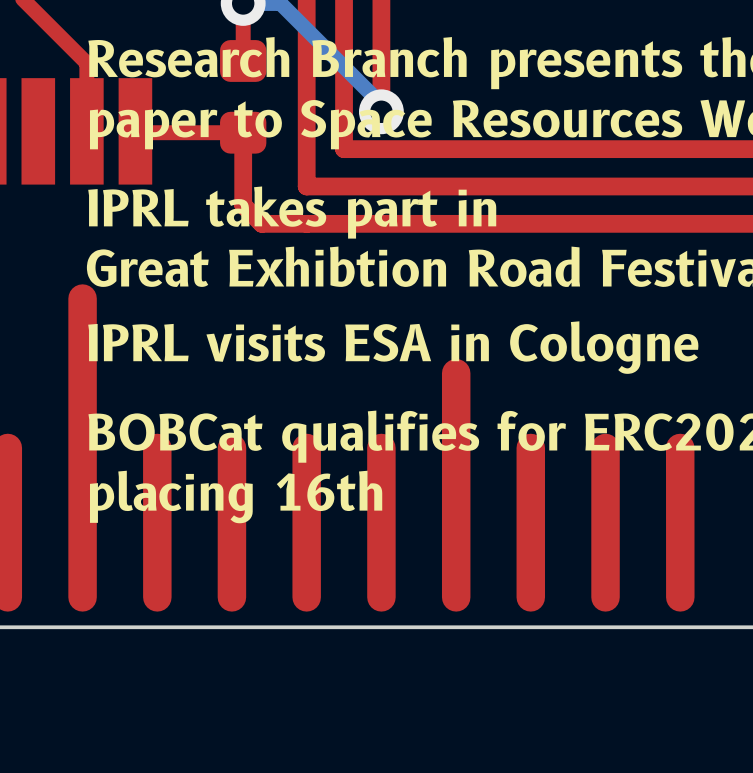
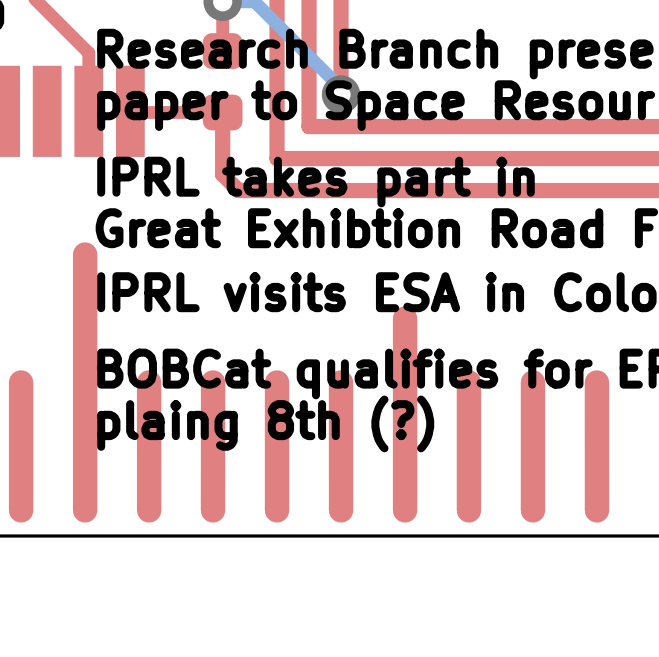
text: placing 16th (236, 497) -> plaing 8th (?) (265, 423)

